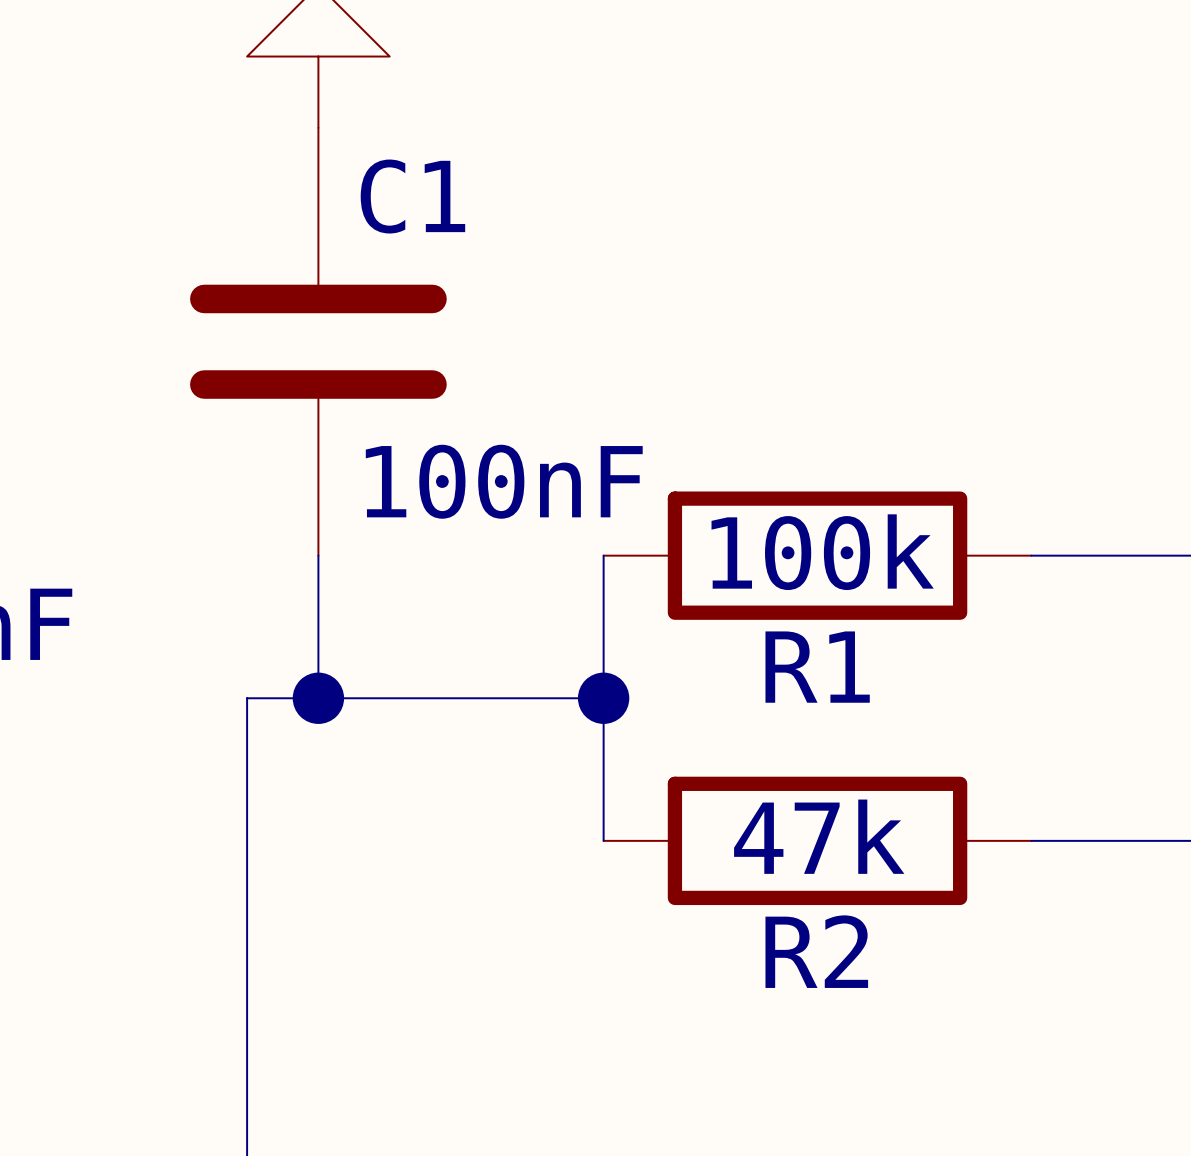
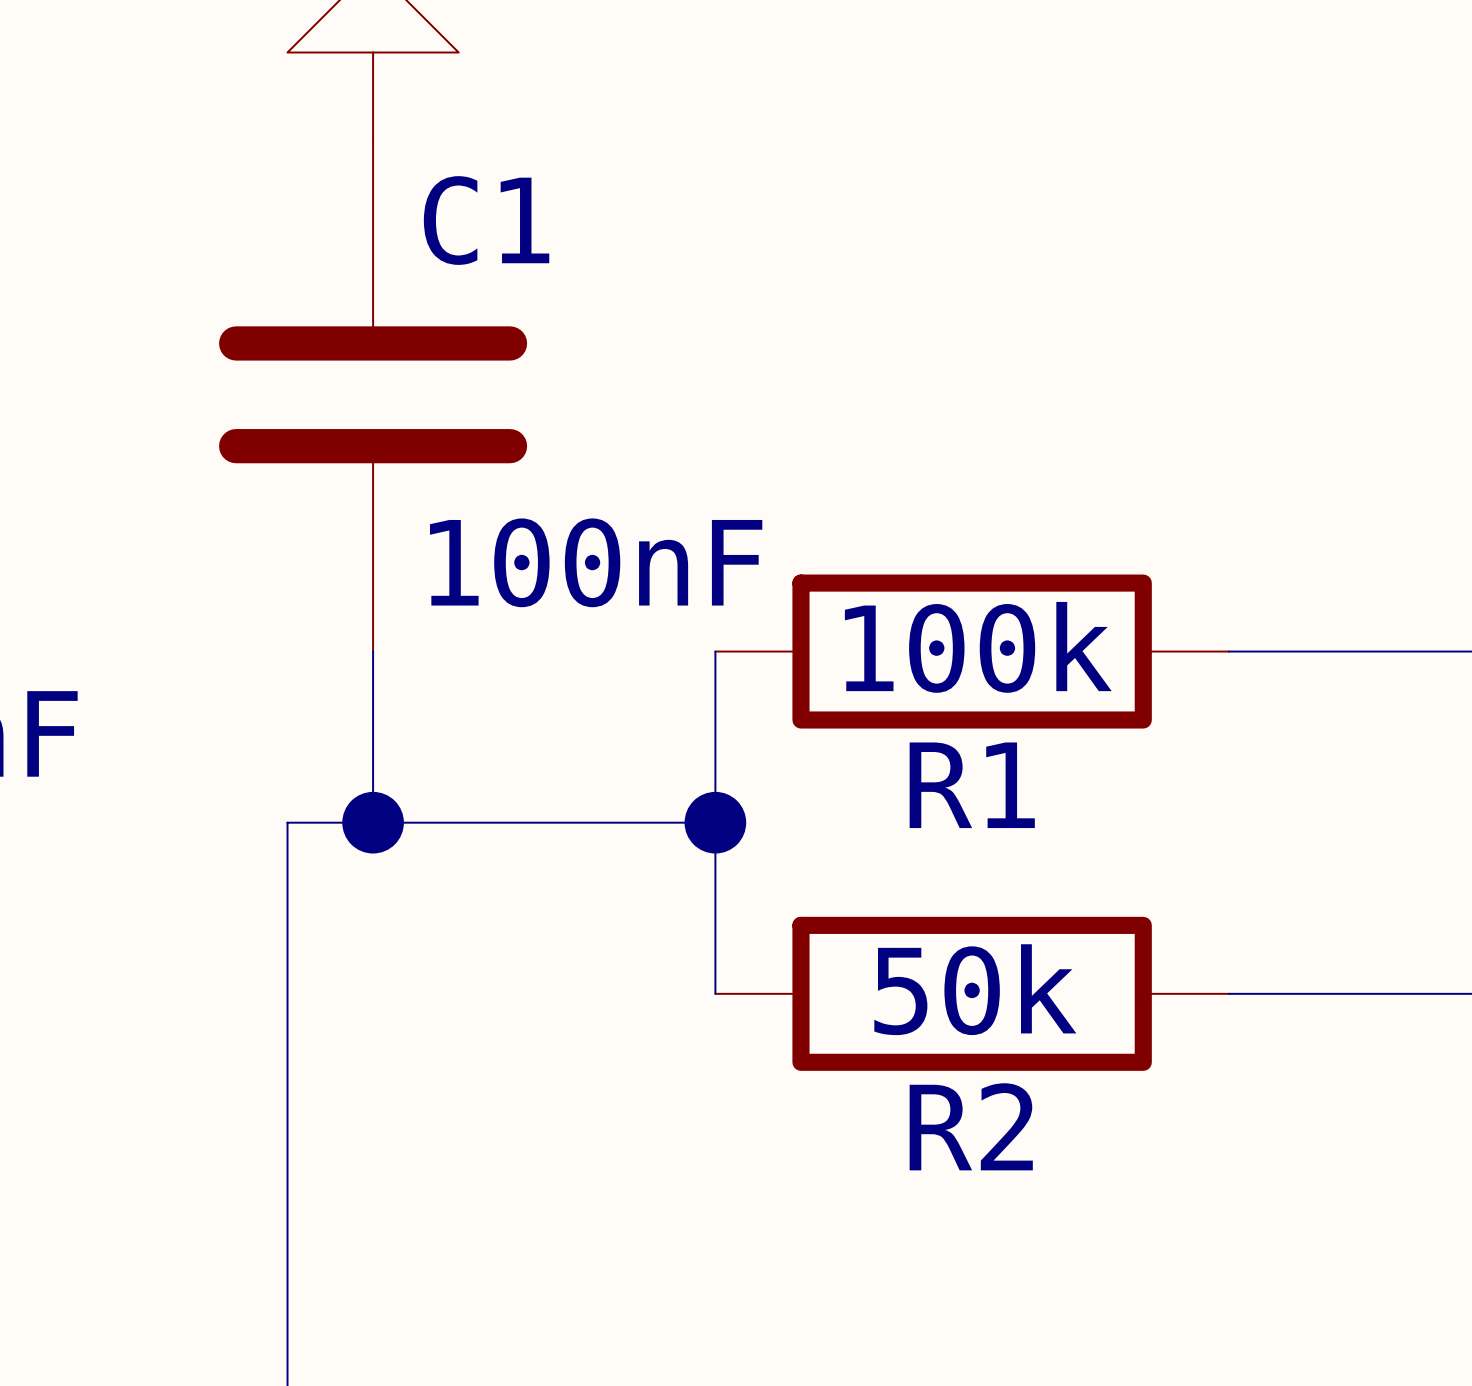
R2 value: 47k (819, 836) -> 50k (975, 989)

